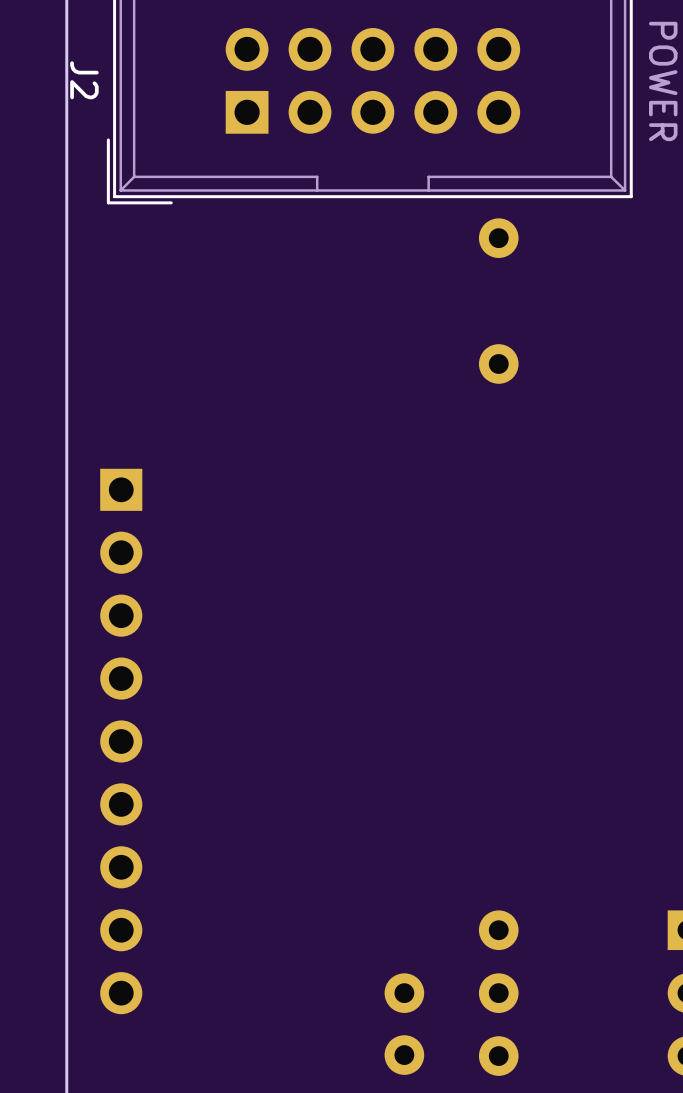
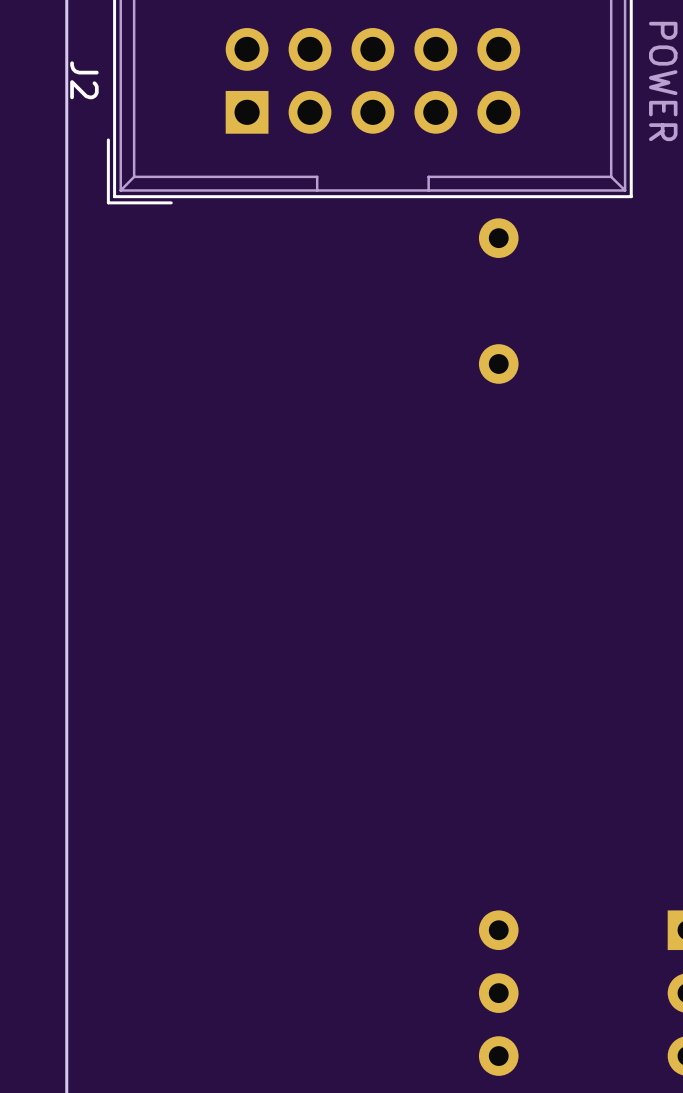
part: (121, 741) -> none
part: (404, 1024) -> none

